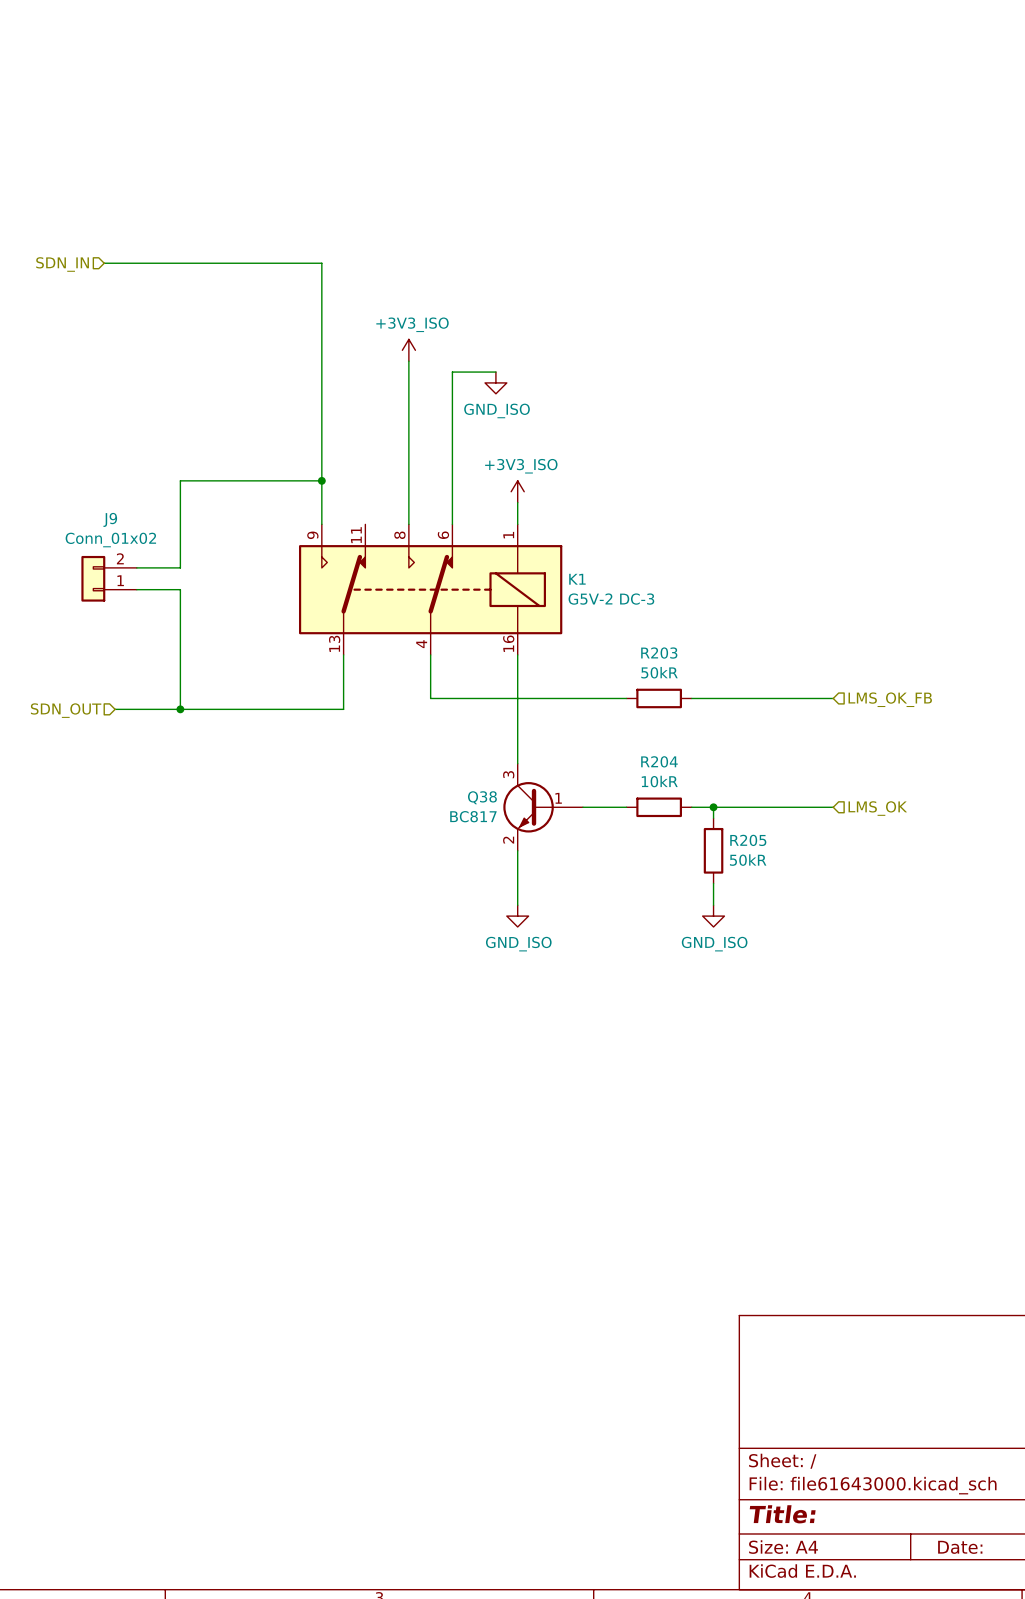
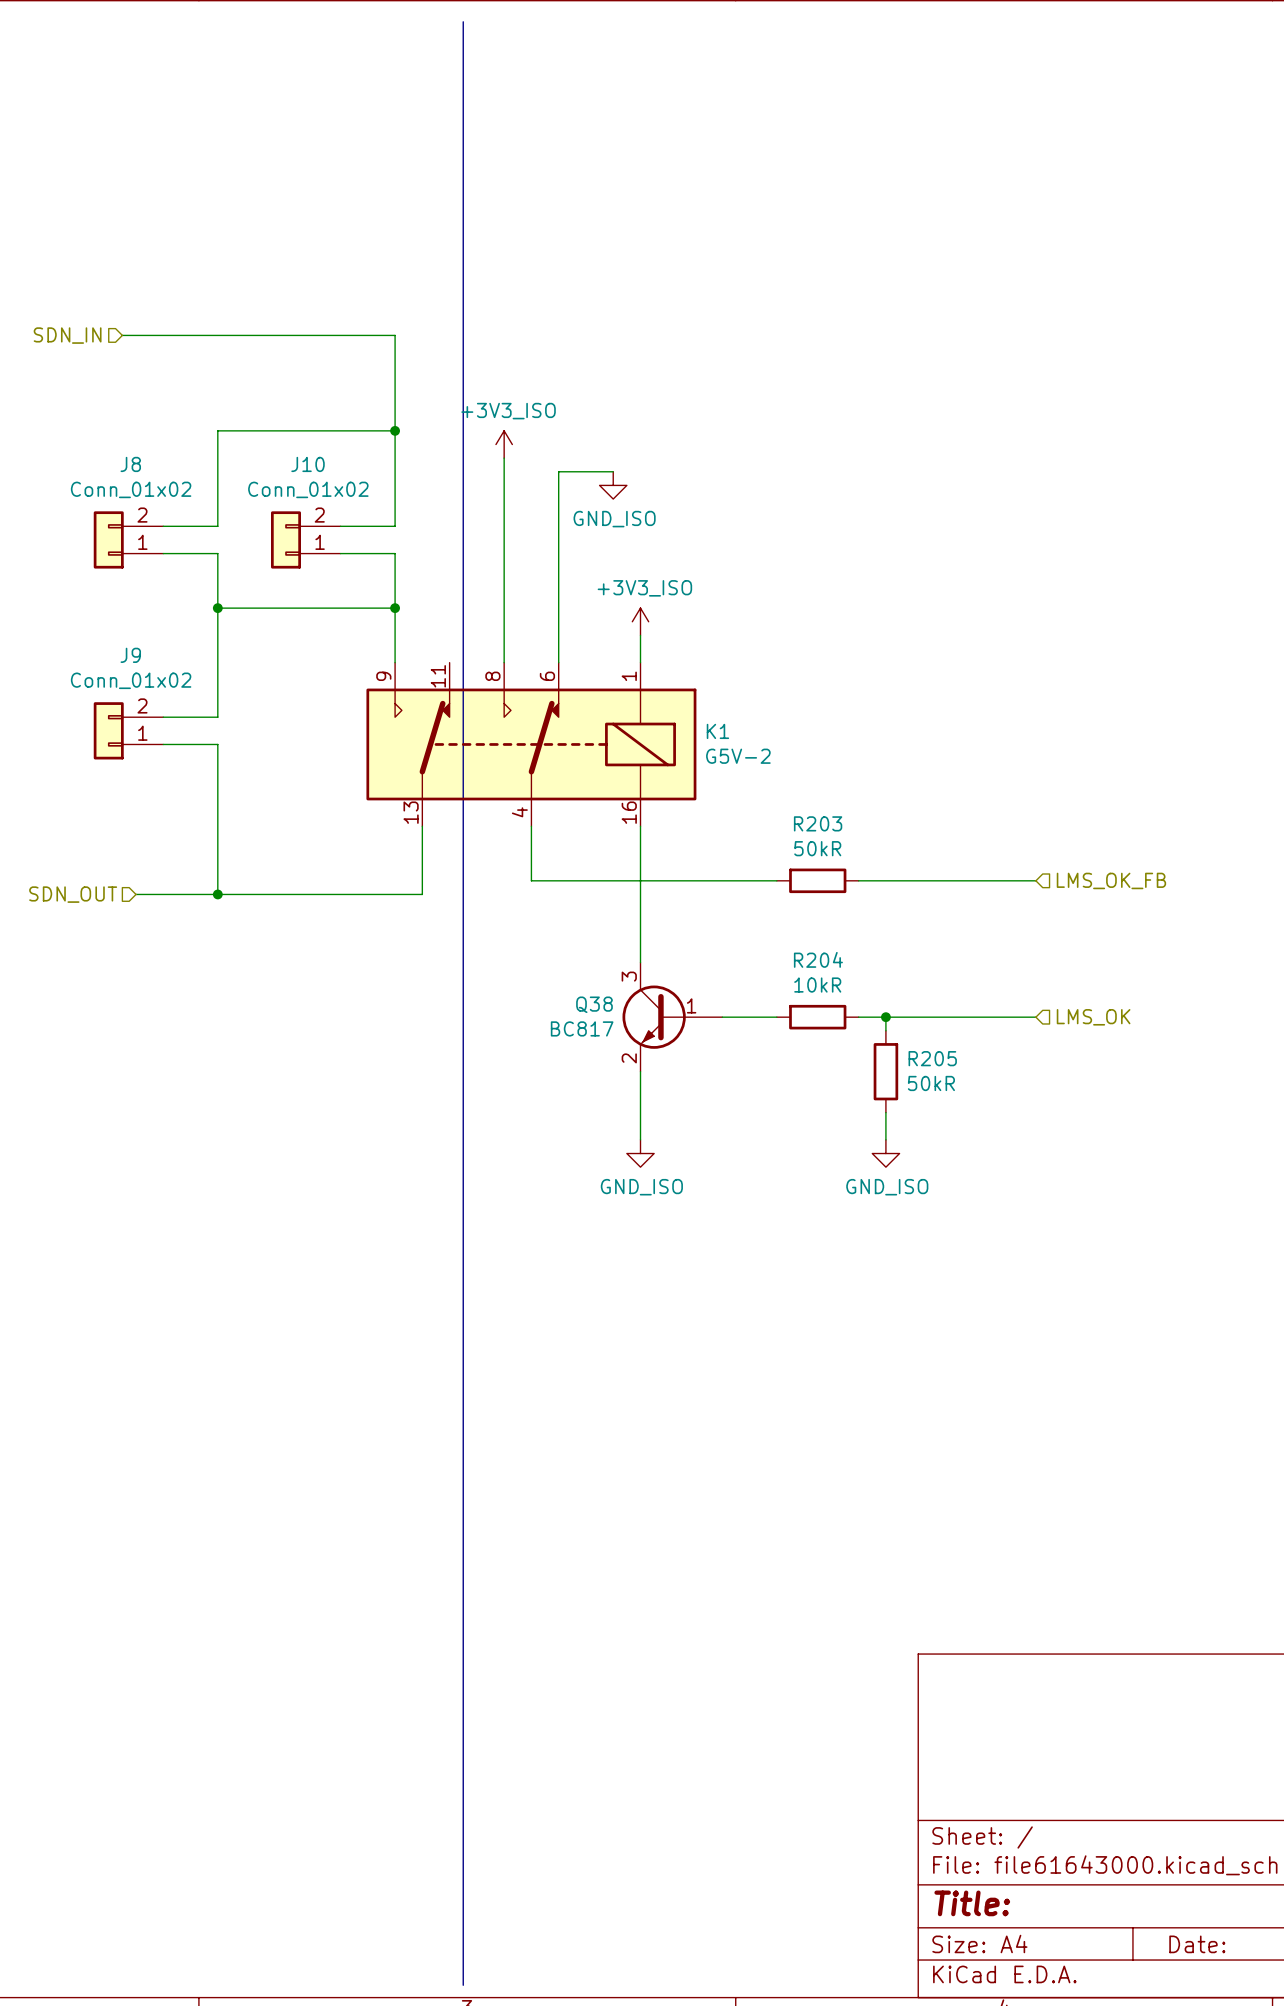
line: none -> (463, 21) (463, 1985)
wire: none -> (395, 430) (217, 430) (217, 526) (163, 526)
junction: none -> (395, 430)
wire: (321, 415) (321, 437) -> (395, 526) (340, 526)
J8: none -> Conn_01x02 (128, 539)
J10: none -> Conn_01x02 (305, 539)
wire: none -> (163, 553) (217, 553) (217, 608)
wire: none -> (340, 553) (395, 553)
junction: none -> (217, 608)
K1 value: G5V-2 DC-3 (611, 599) -> G5V-2 (738, 756)

